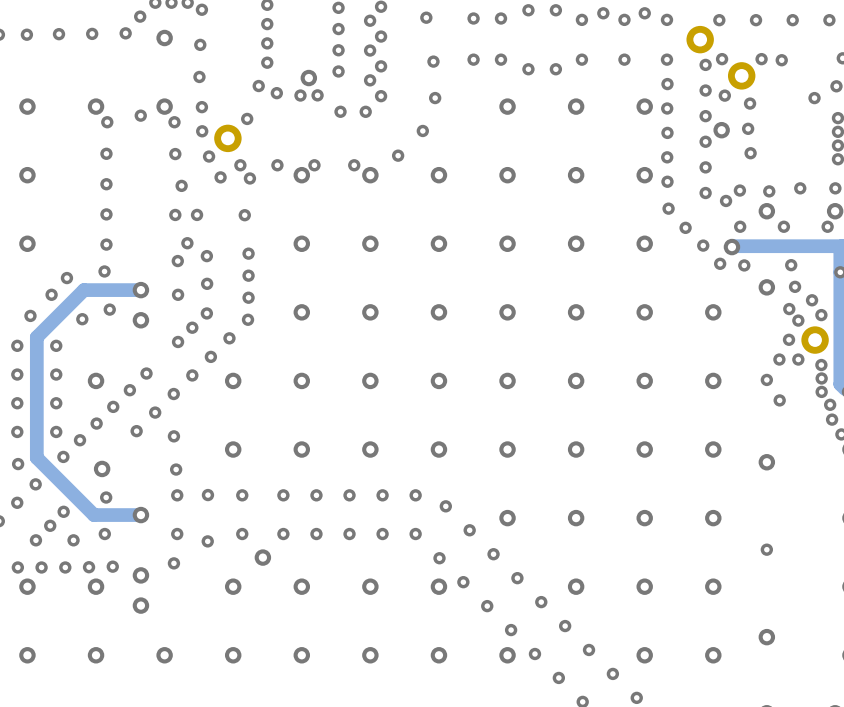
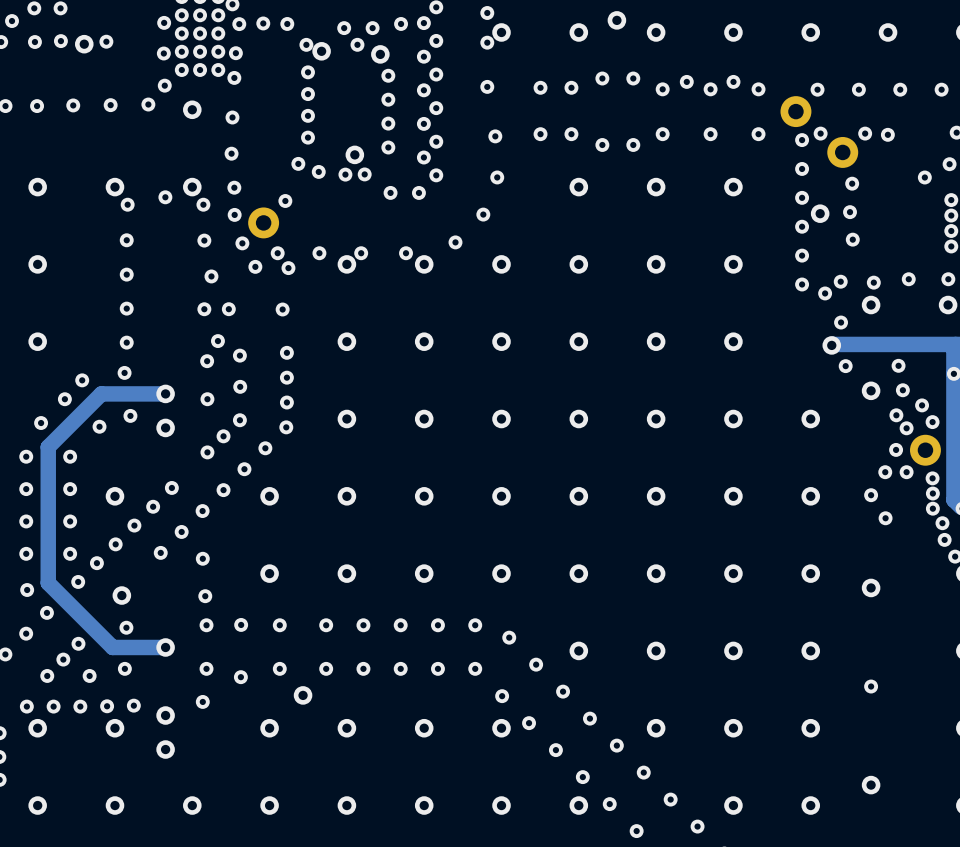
via: (667, 84) -> none
via: (724, 95) -> none
via: (667, 108) -> none
via: (667, 132) -> none
via: (667, 157) -> none
via: (667, 181) -> none
via: (668, 208) -> none
via: (783, 226) -> none
via: (827, 226) -> none
via: (685, 227) -> none
via: (703, 245) -> none
via: (720, 263) -> none

